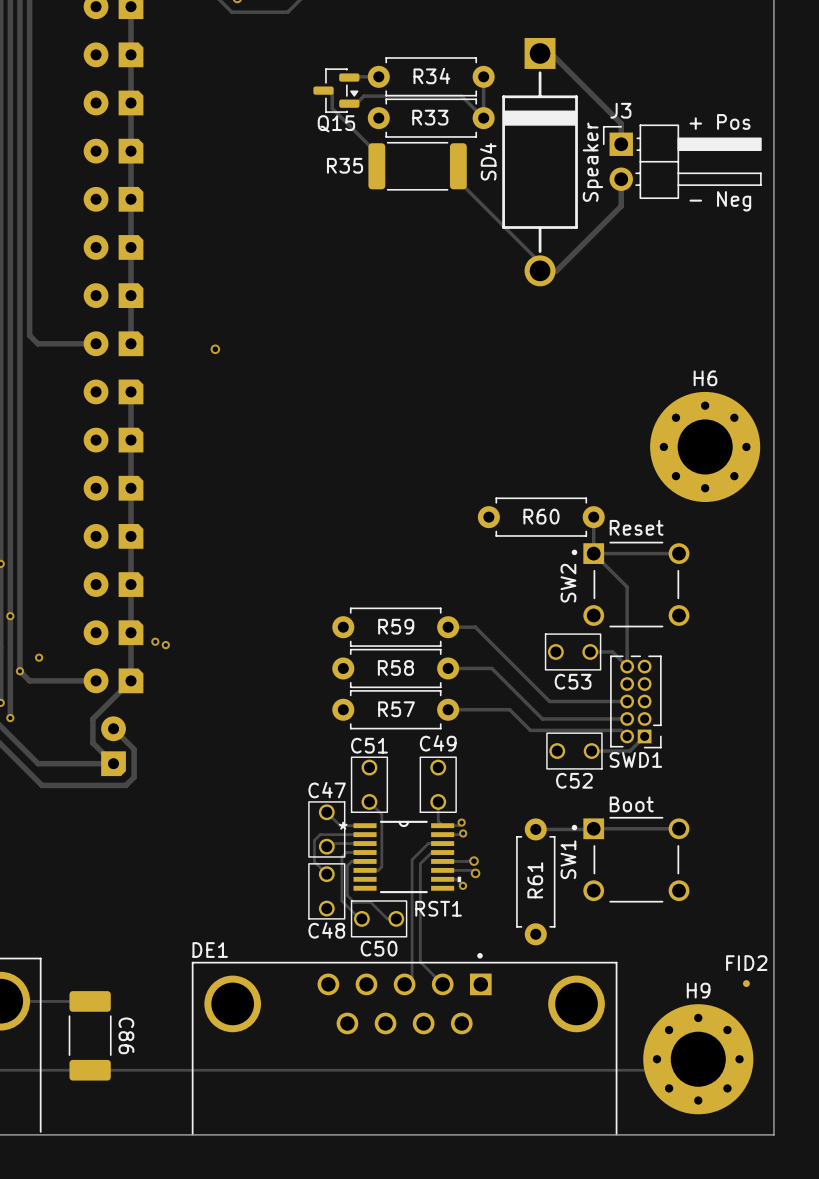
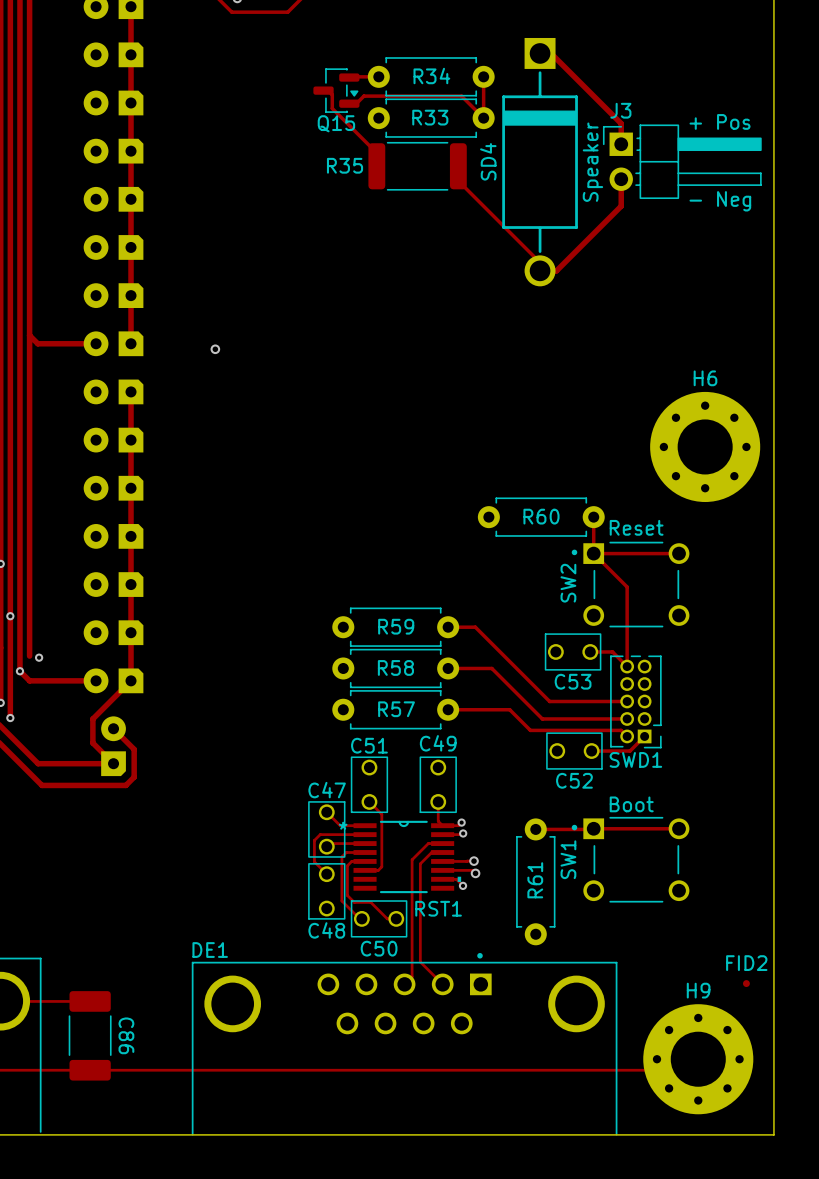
track: none -> (29, 335) (29, 656)
via: (155, 641) -> none
via: (165, 645) -> none

